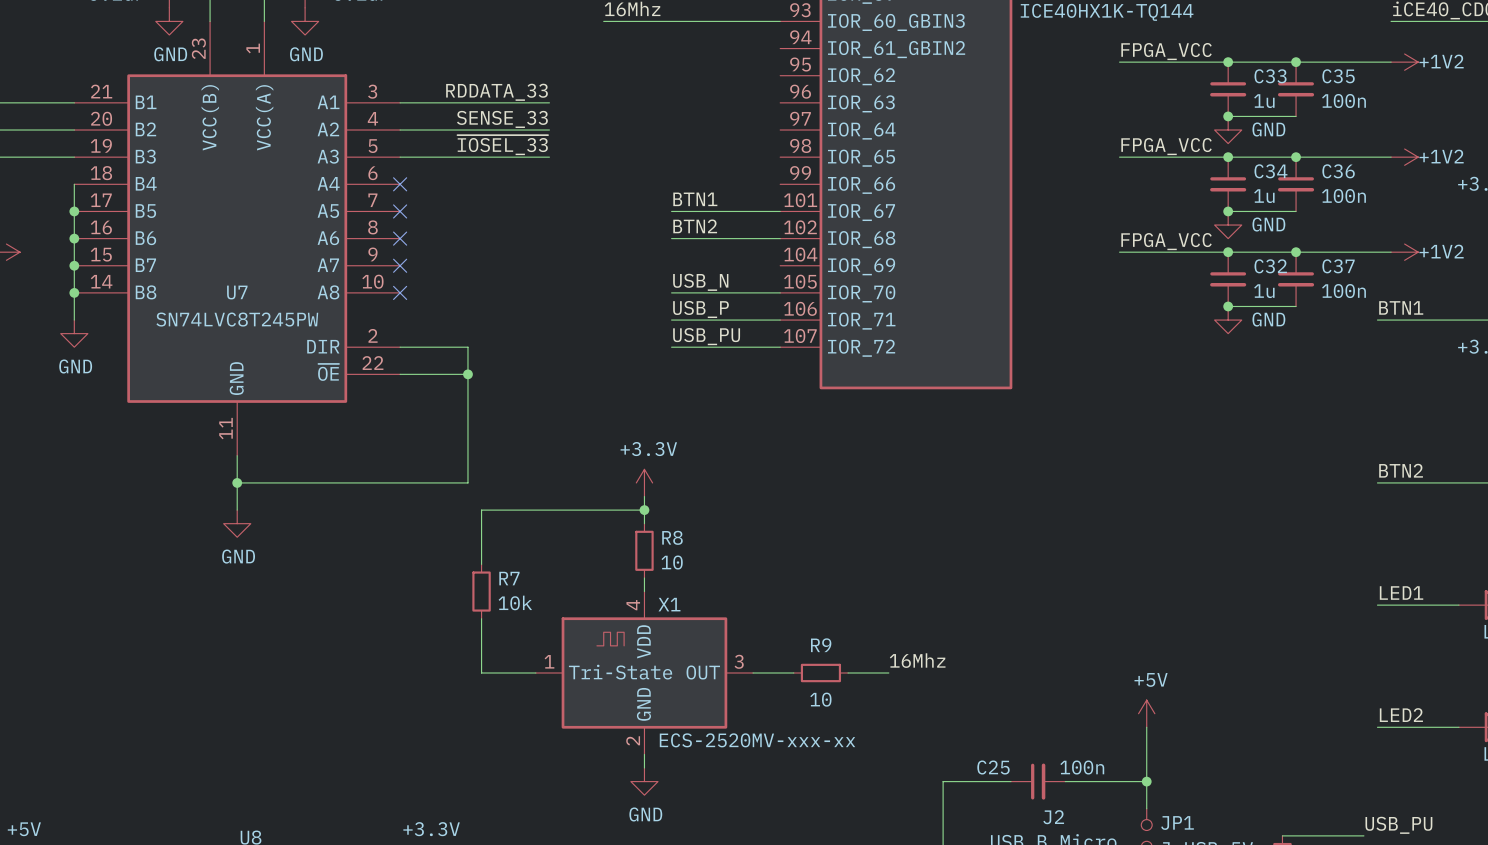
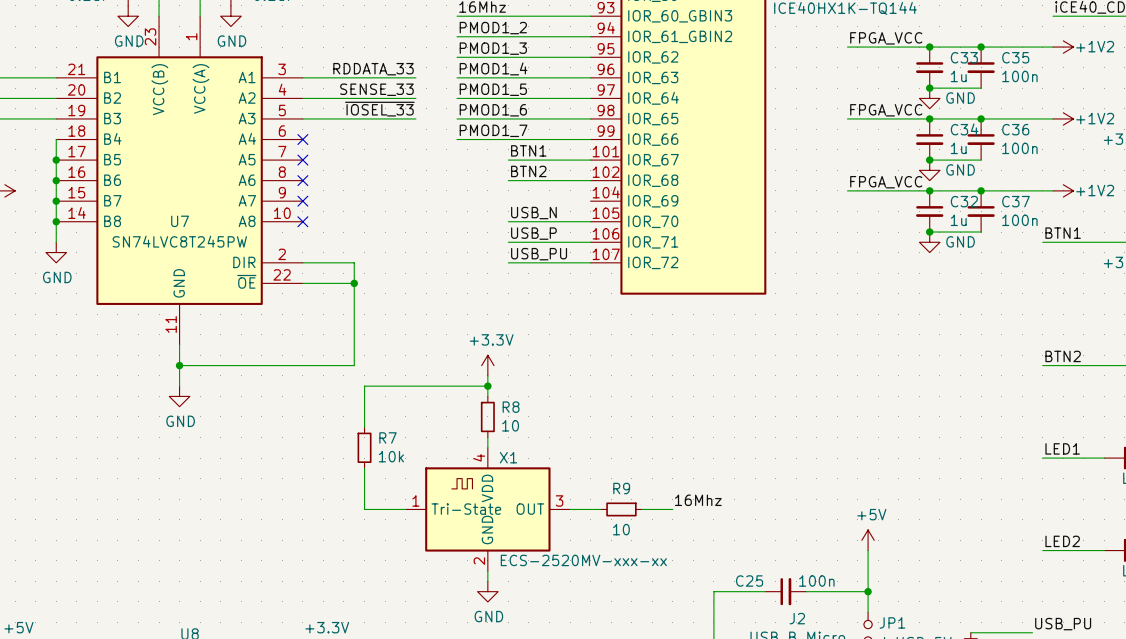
label: none -> PMOD1_2 (493, 28)
wire: none -> (457, 36) (590, 36)
label: none -> PMOD1_3 (493, 48)
wire: none -> (457, 57) (590, 57)
label: none -> PMOD1_4 (493, 68)
wire: none -> (457, 77) (590, 77)
label: none -> PMOD1_5 (493, 89)
wire: none -> (457, 98) (590, 98)
label: none -> PMOD1_6 (493, 110)
wire: none -> (457, 118) (590, 118)
label: none -> PMOD1_7 (493, 130)
wire: none -> (457, 139) (590, 139)

